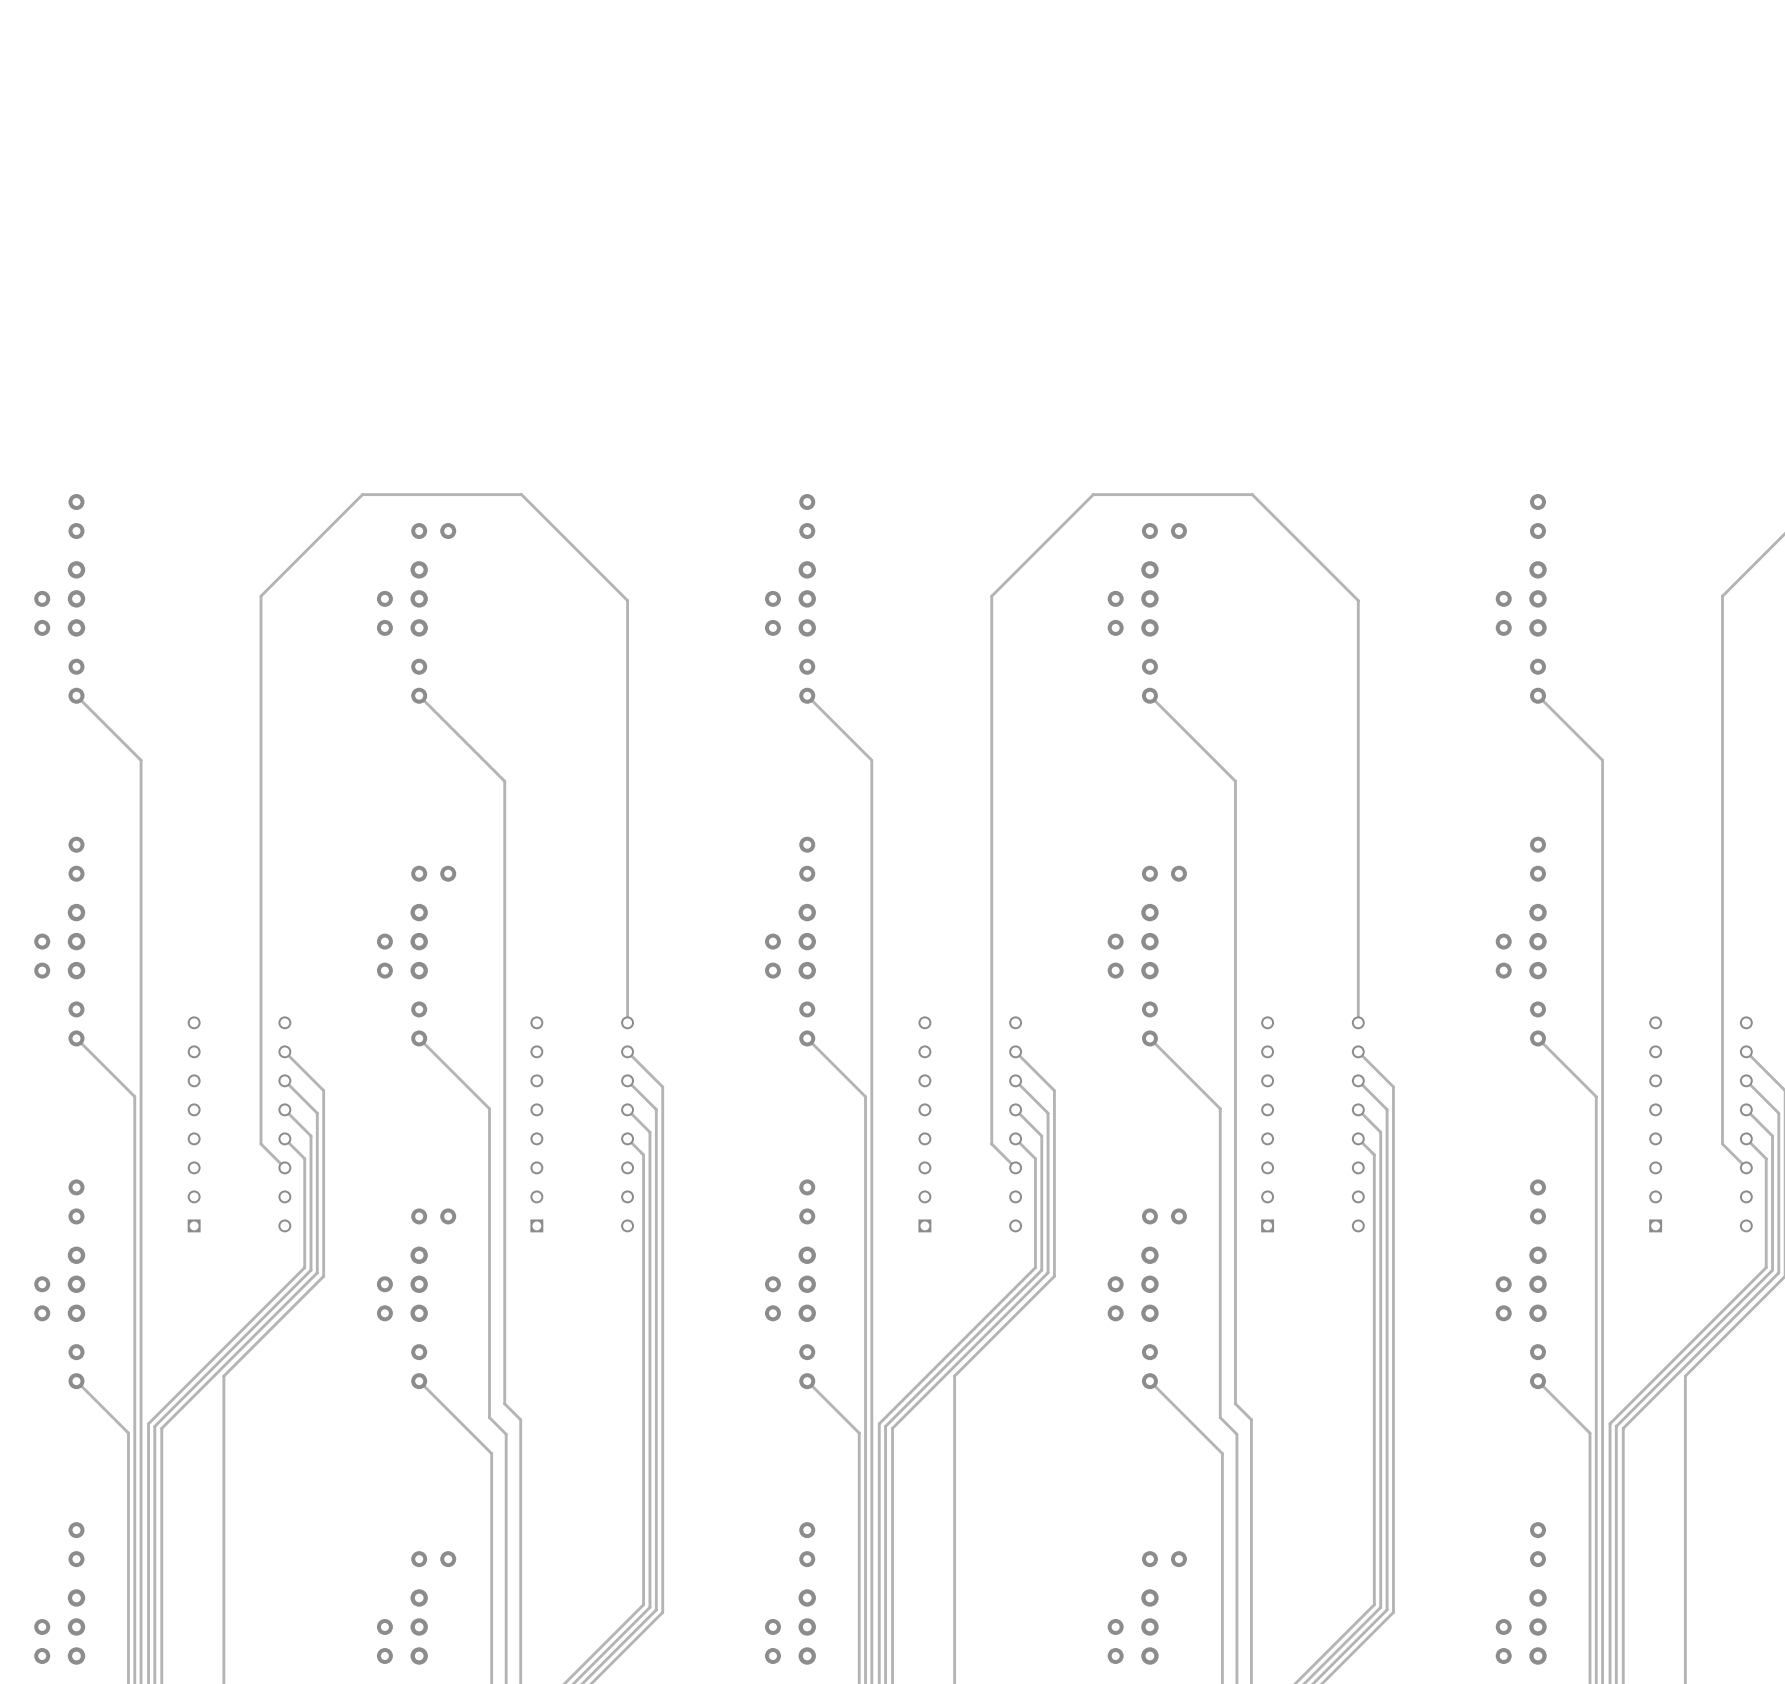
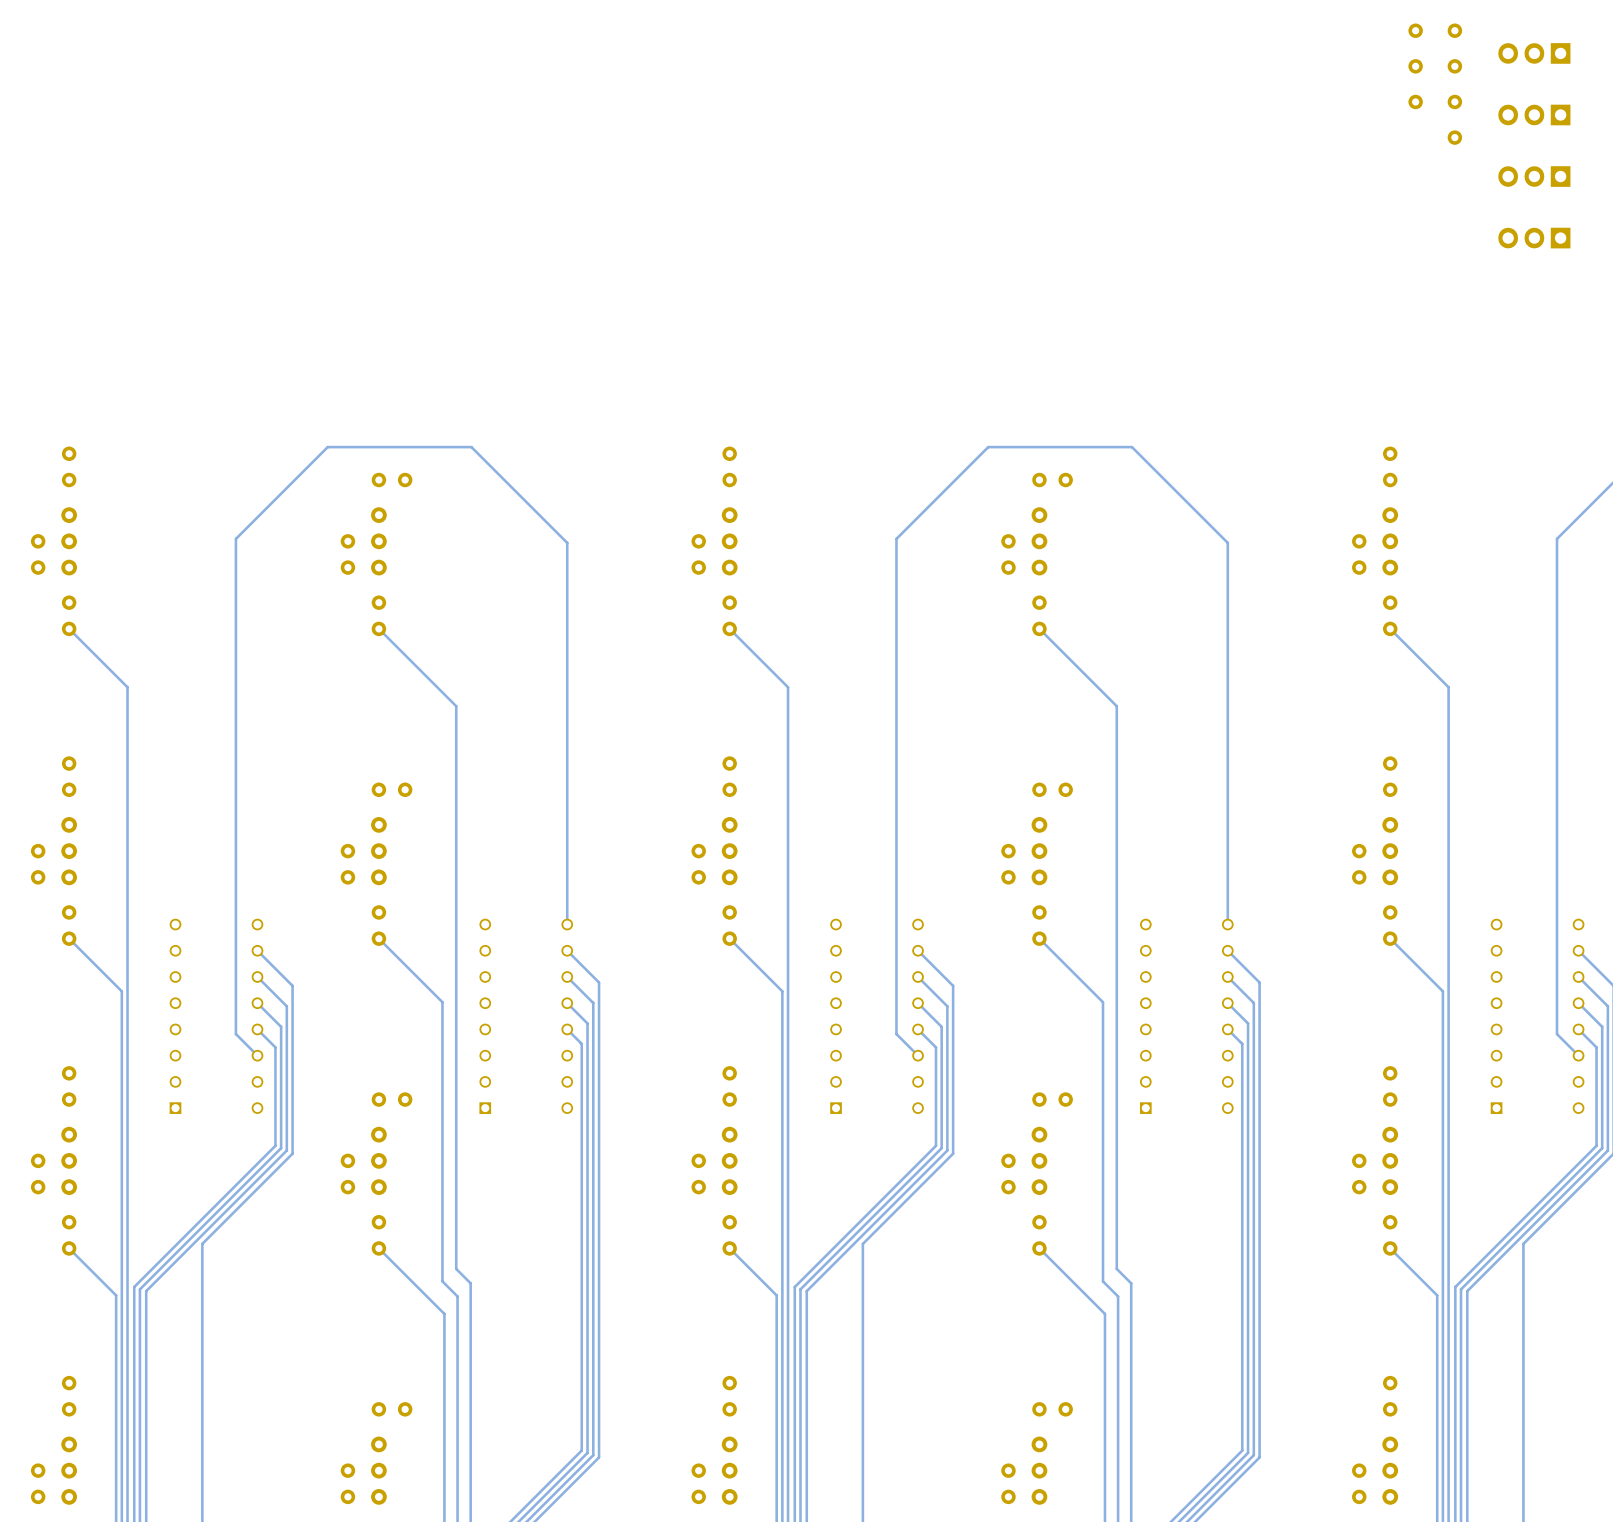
part: none -> (1415, 30)
part: none -> (1454, 30)
part: none -> (1534, 53)
part: none -> (1415, 66)
part: none -> (1454, 66)
part: none -> (1415, 101)
part: none -> (1454, 101)
part: none -> (1534, 114)
part: none -> (1454, 137)
part: none -> (1534, 176)
part: none -> (1534, 238)

